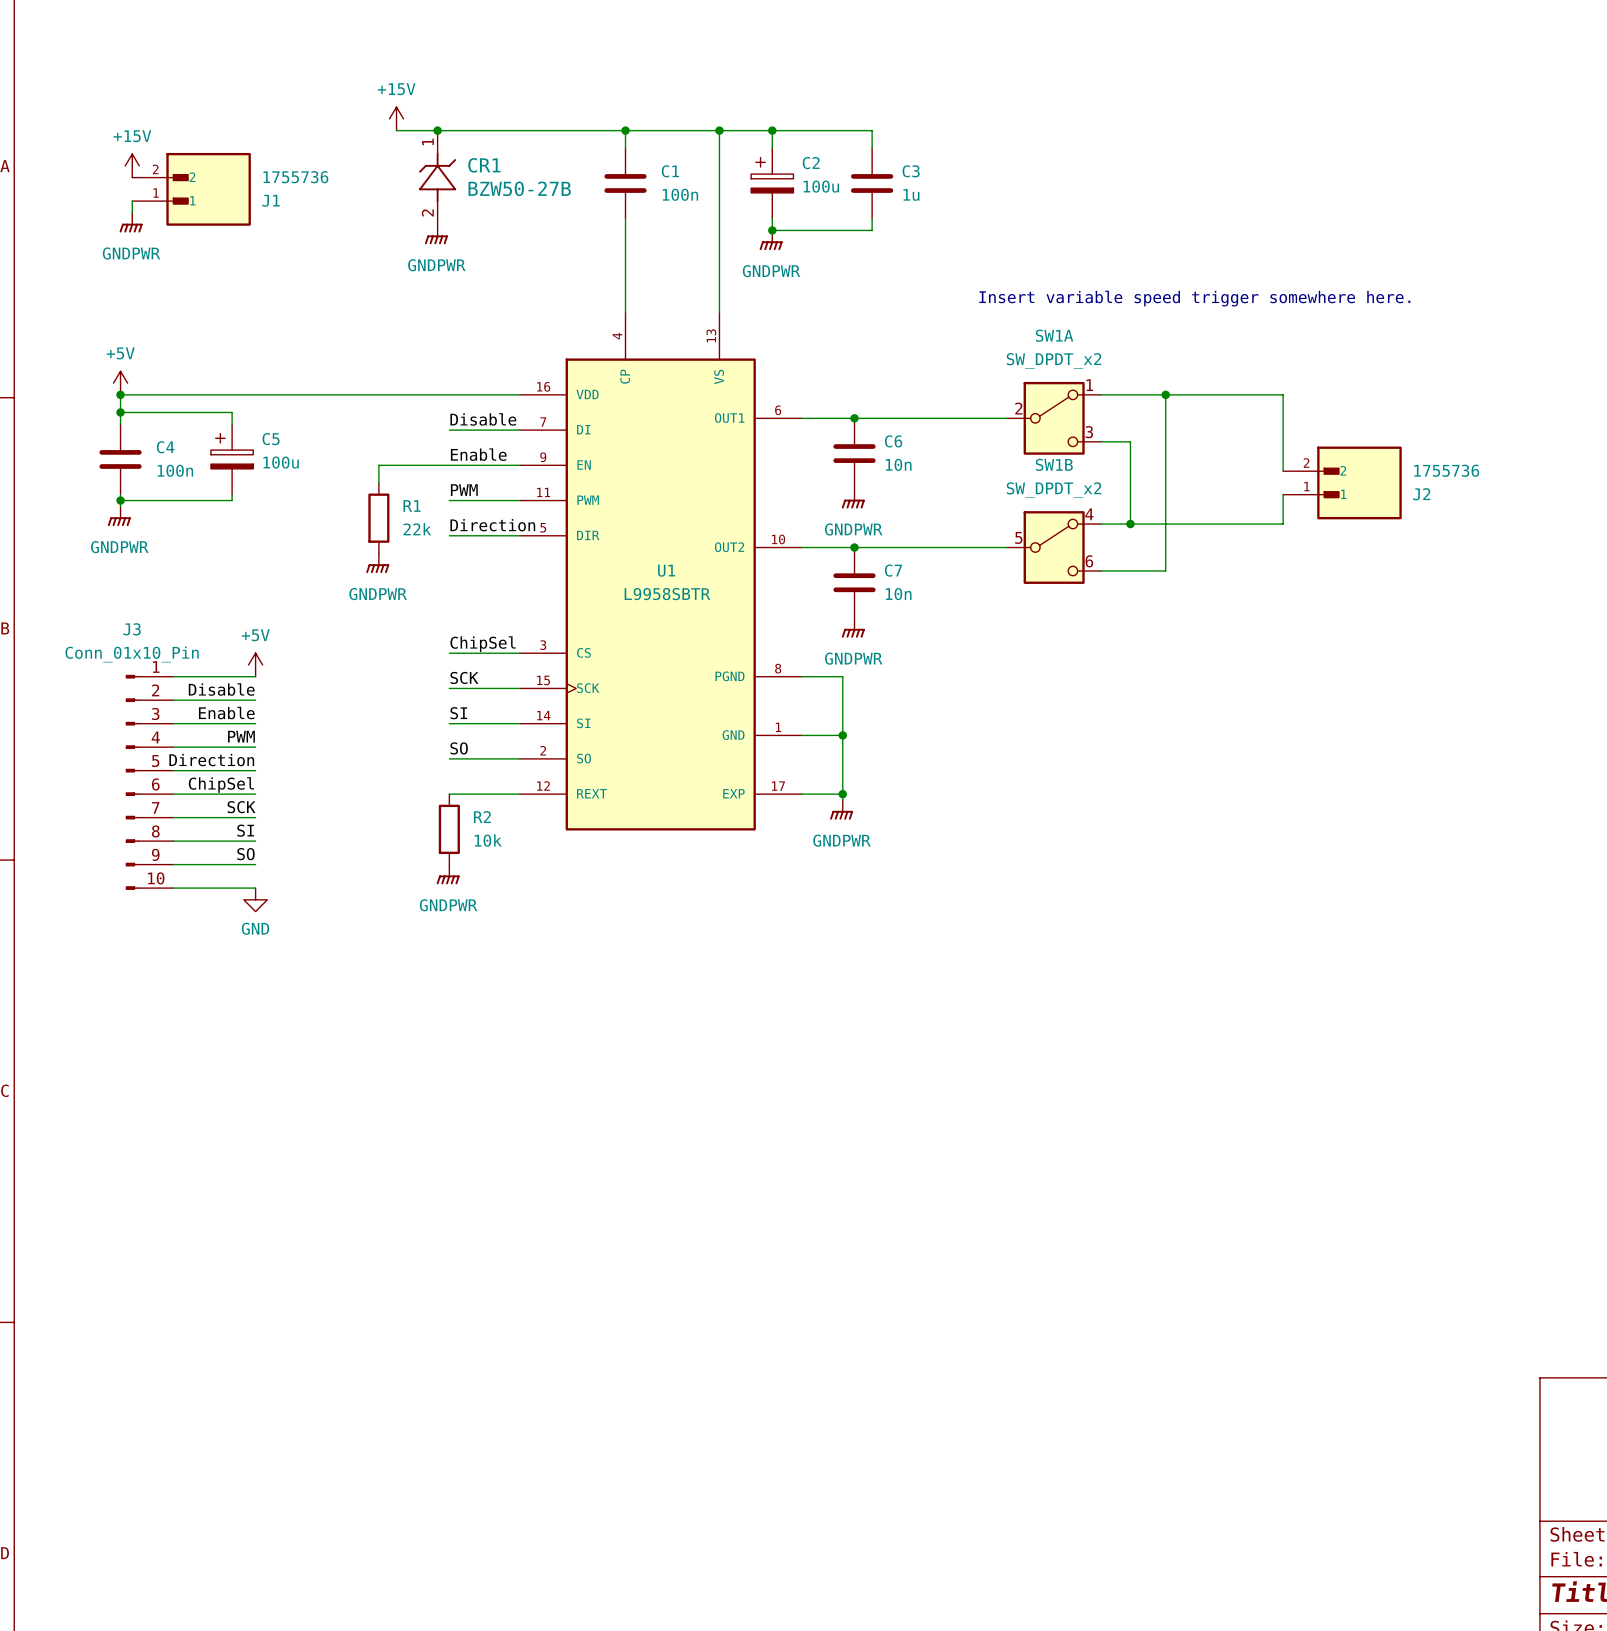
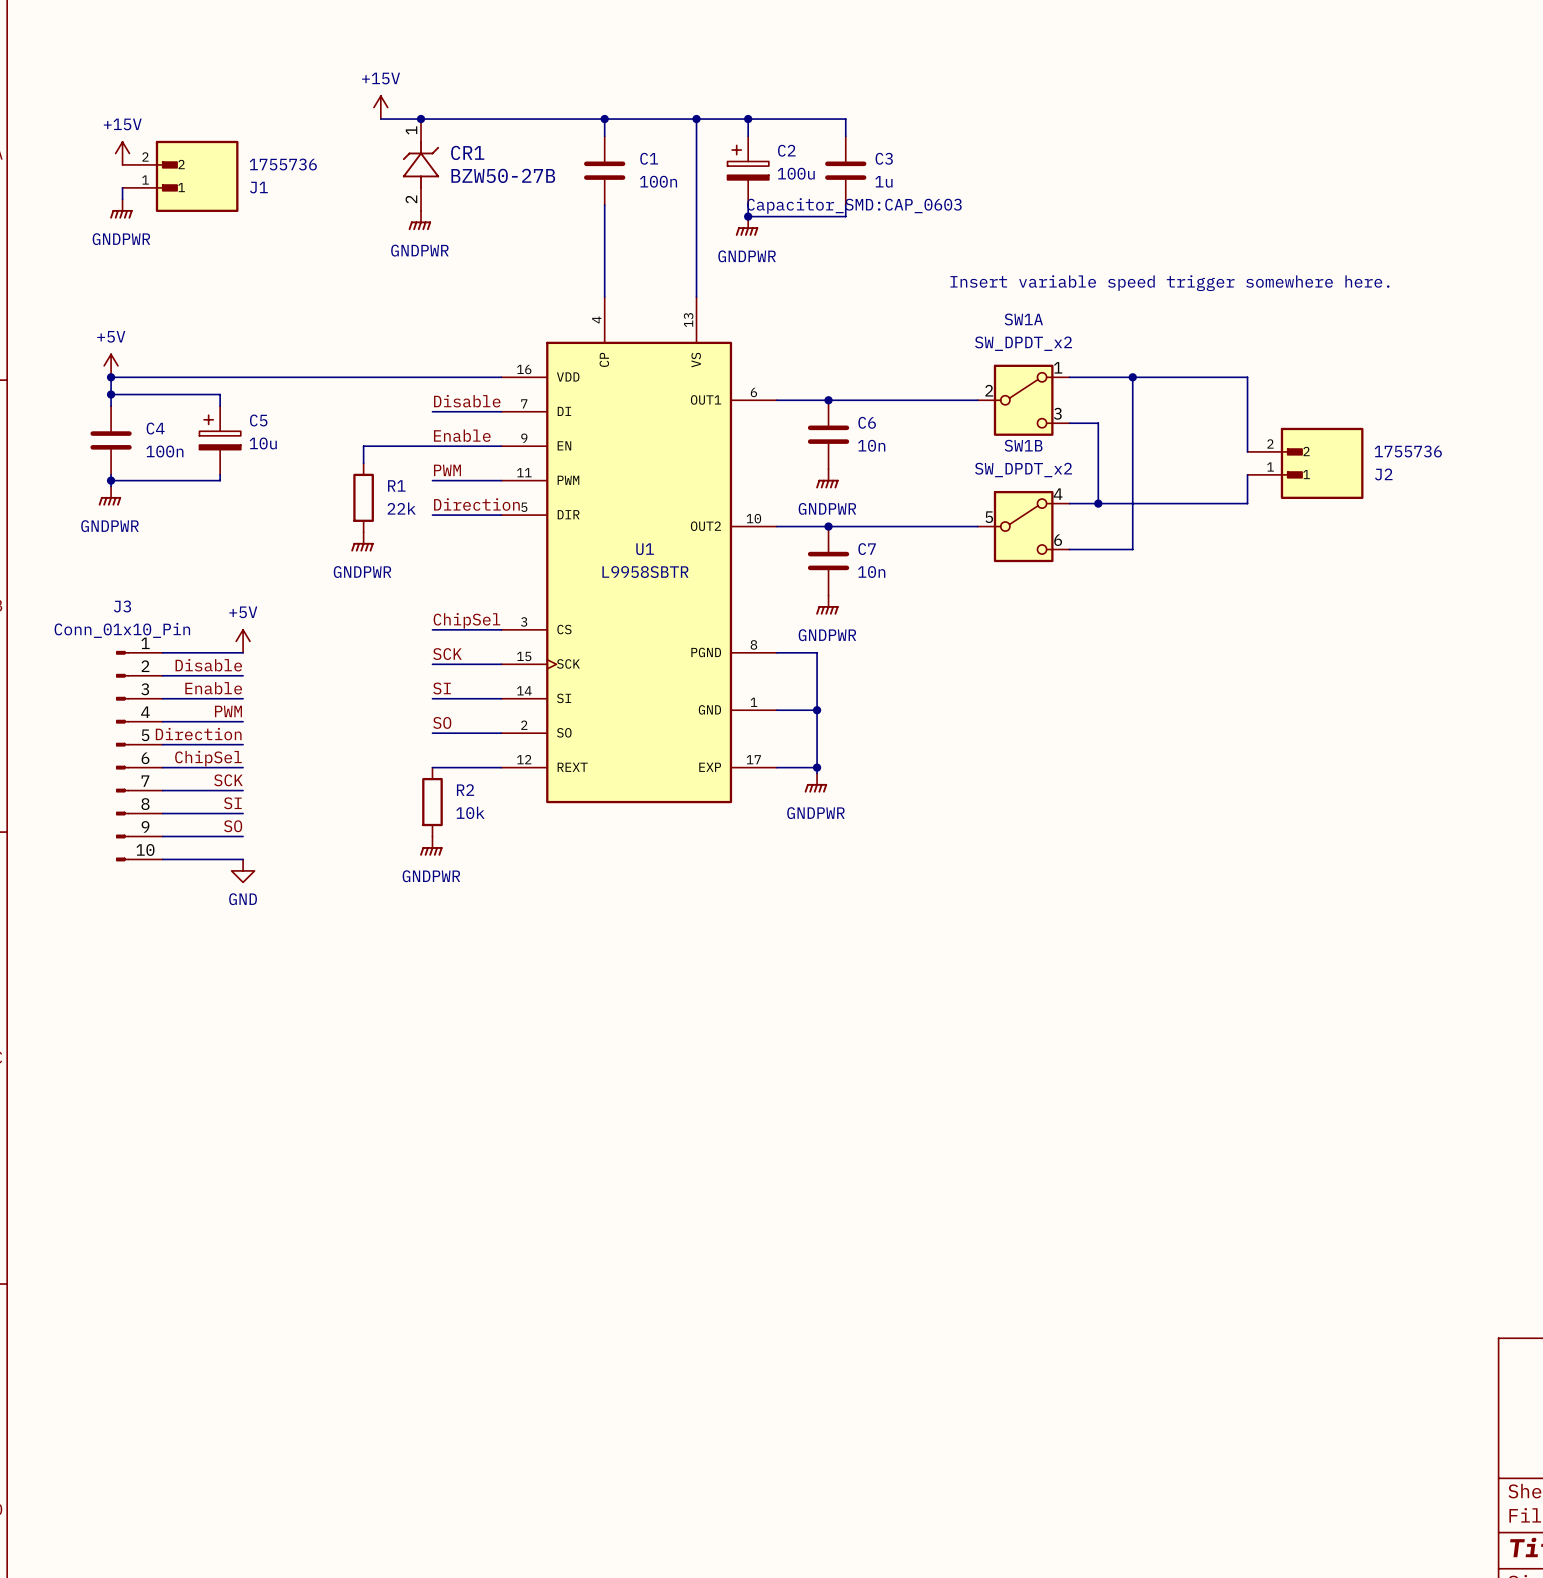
C3 text: none -> Capacitor_SMD:CAP_0603 (854, 205)
C5 value: 100u (281, 462) -> 10u (263, 443)

